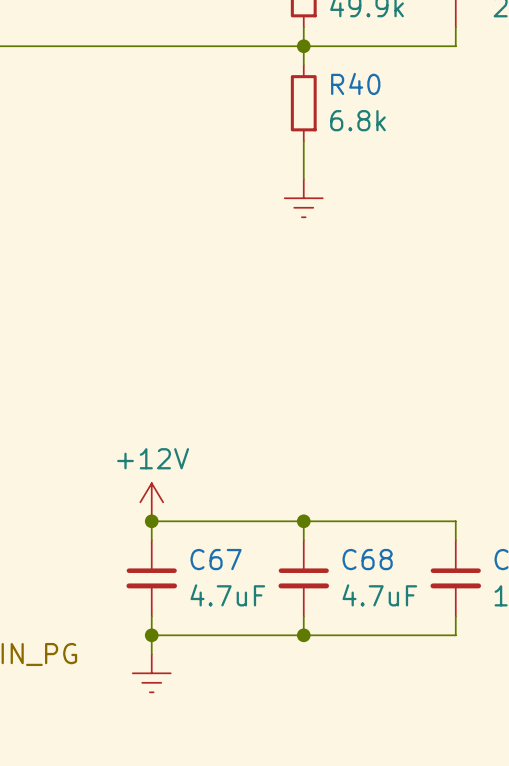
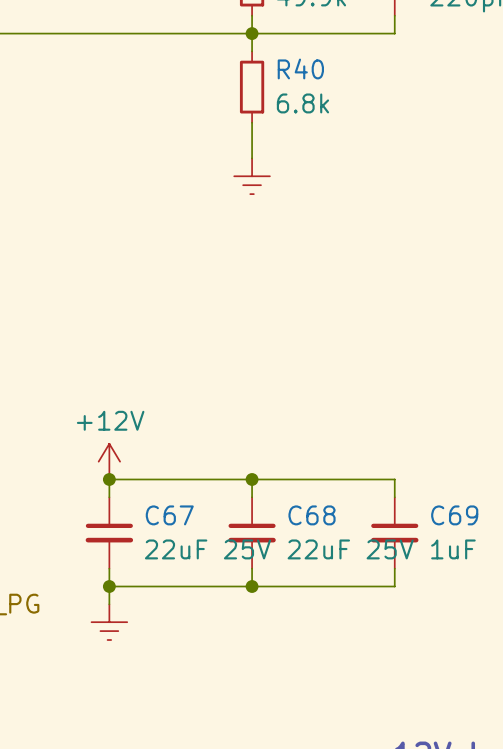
C67 value: 4.7uF (227, 595) -> 22uF 25V (207, 549)
C68 value: 4.7uF (379, 595) -> 22uF 25V (350, 549)

